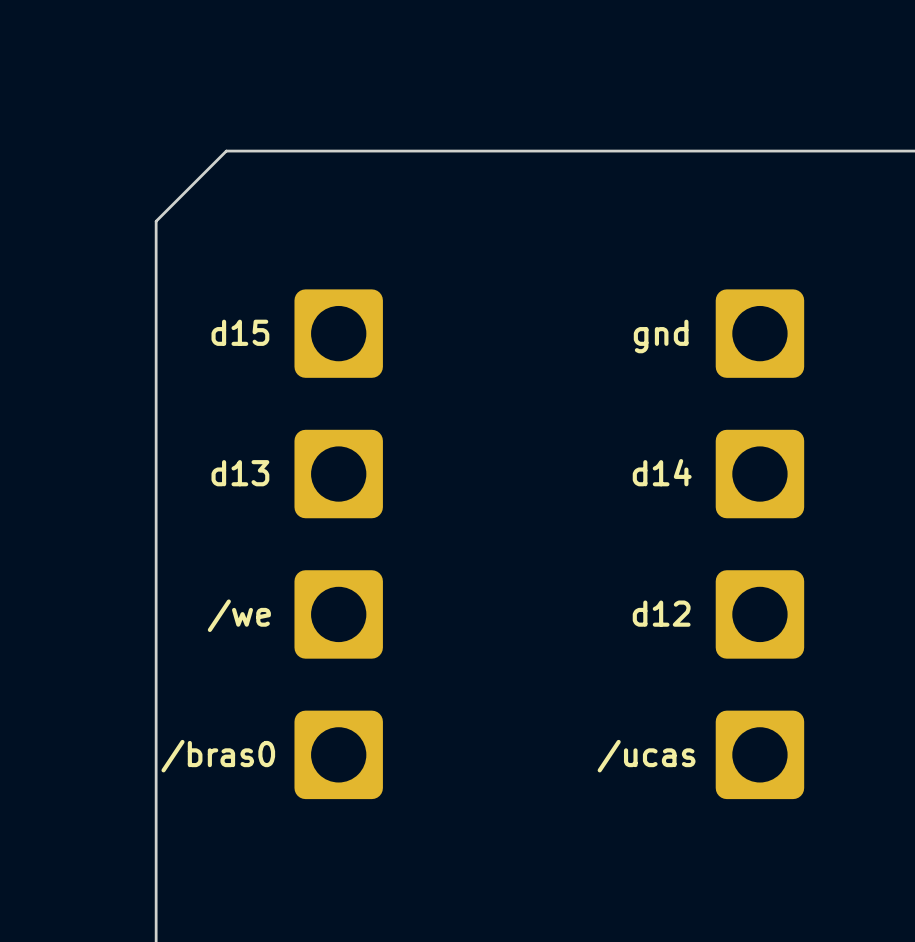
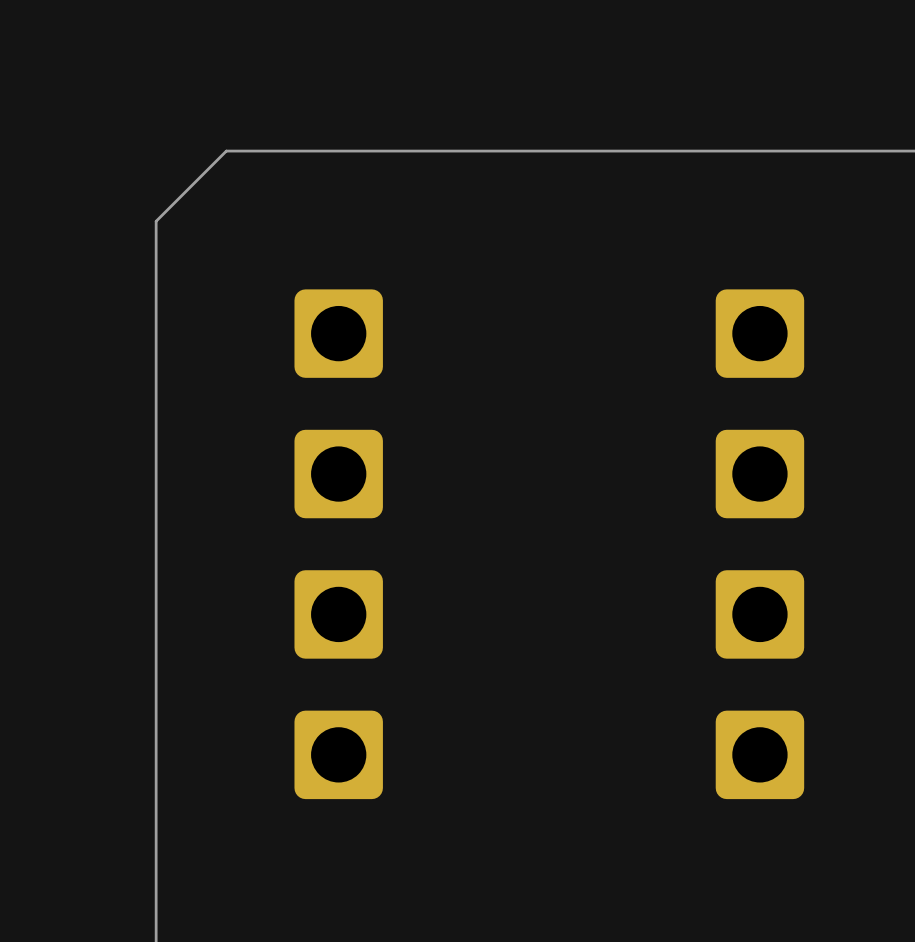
text: d15 (240, 332) -> none
text: gnd (661, 336) -> none
text: d14 (662, 472) -> none
text: d13 (240, 473) -> none
text: d12 (661, 613) -> none
text: /we (239, 615) -> none
text: /bras0 (218, 756) -> none
text: /ucas (646, 756) -> none

